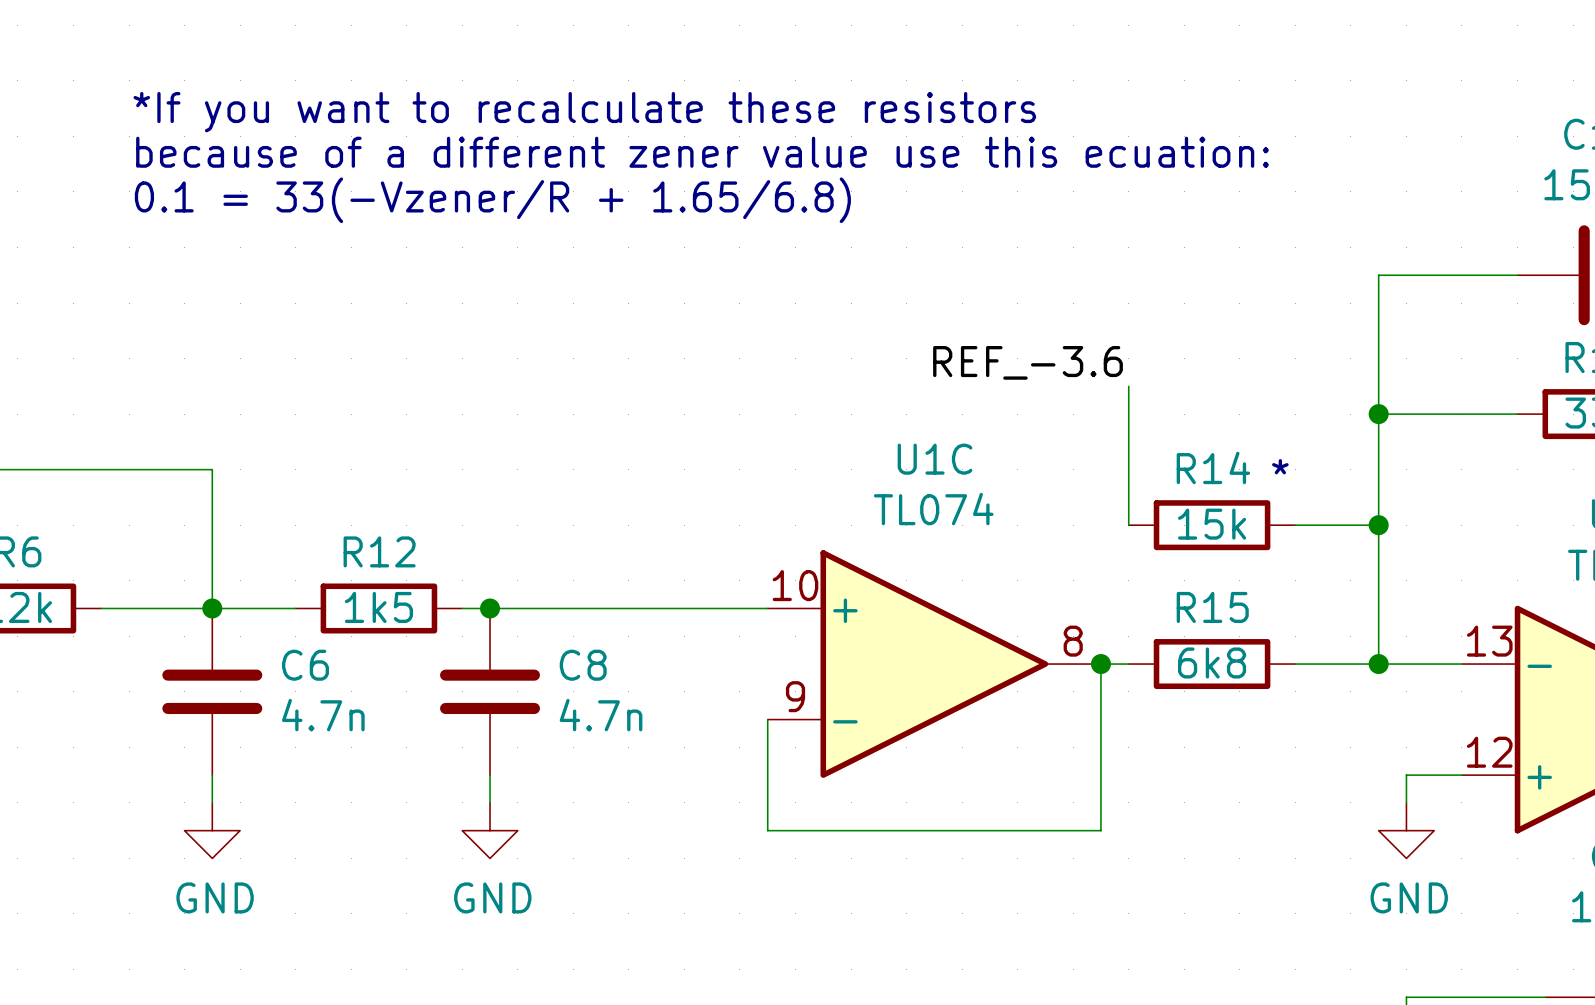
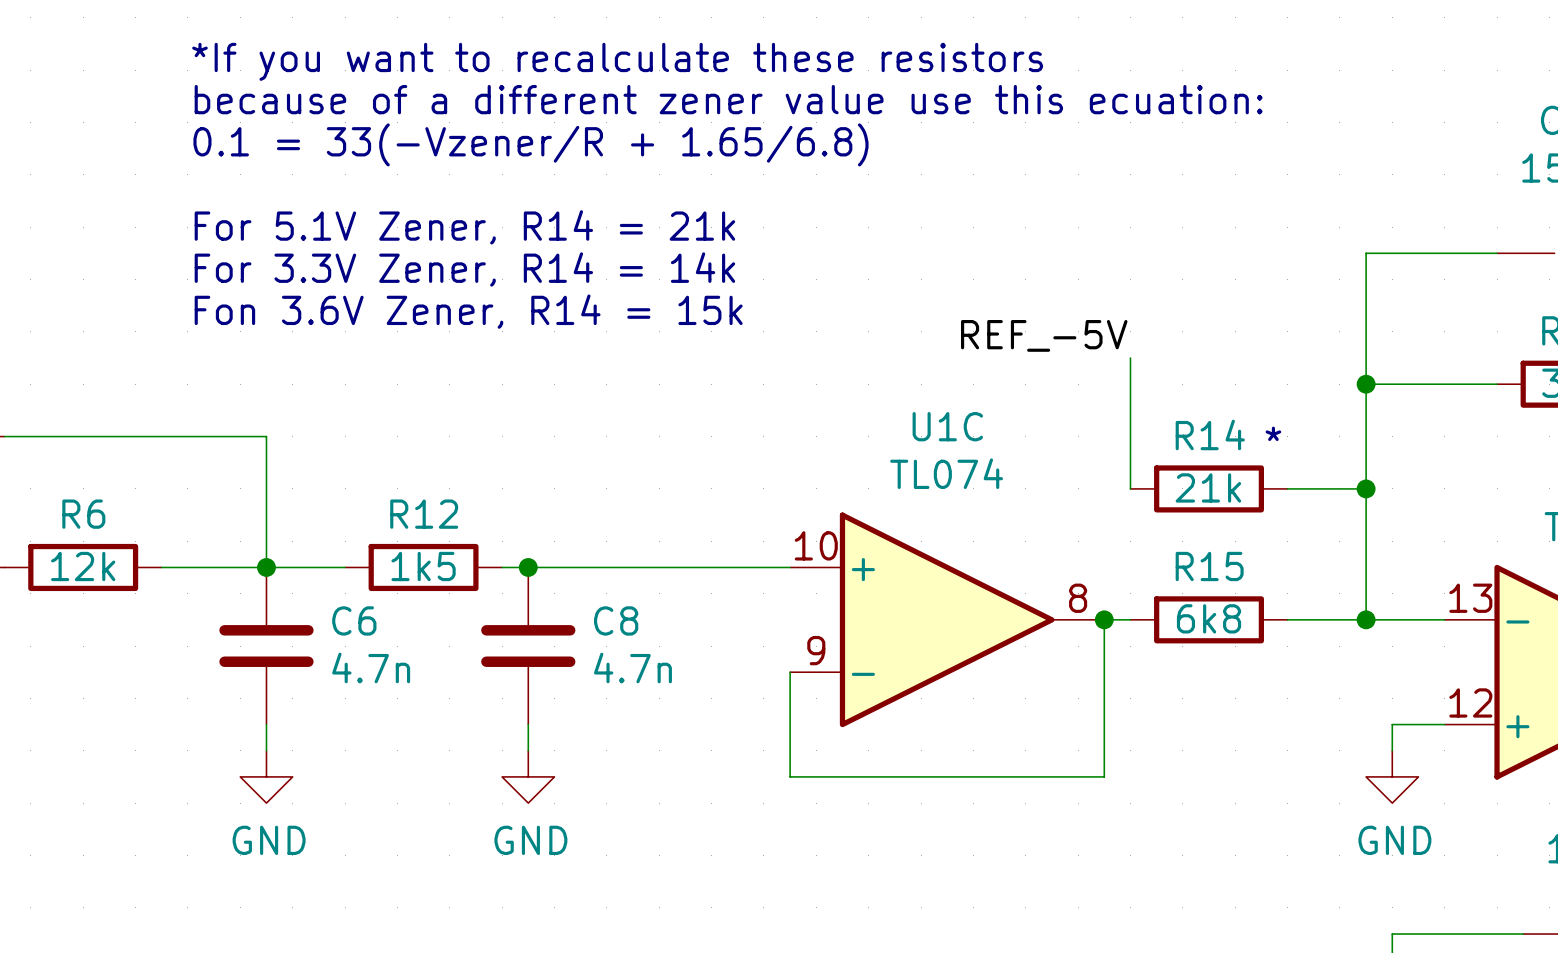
text: none -> *If you want to recalculate these resistors (617, 61)
text: *If you want to recalculate these resistors (584, 112) -> because of a different zener value use this ecuation: (728, 99)
text: because of a different zener value use this ecuation: (702, 152) -> 0.1 = 33(-Vzener/R + 1.65/6.8) (530, 144)
text: 0.1 = 33(-Vzener/R + 1.65/6.8) (492, 200) -> none
text: none -> For 5.1V Zener, R14 = 21k (464, 227)
text: none -> For 3.3V Zener, R14 = 14k (464, 269)
text: none -> Fon 3.6V Zener, R14 = 15k (468, 311)
label: REF_-3.6 (1028, 362) -> REF_-5V (1044, 335)
R14 value: 15k (1212, 524) -> 21k (1208, 487)

